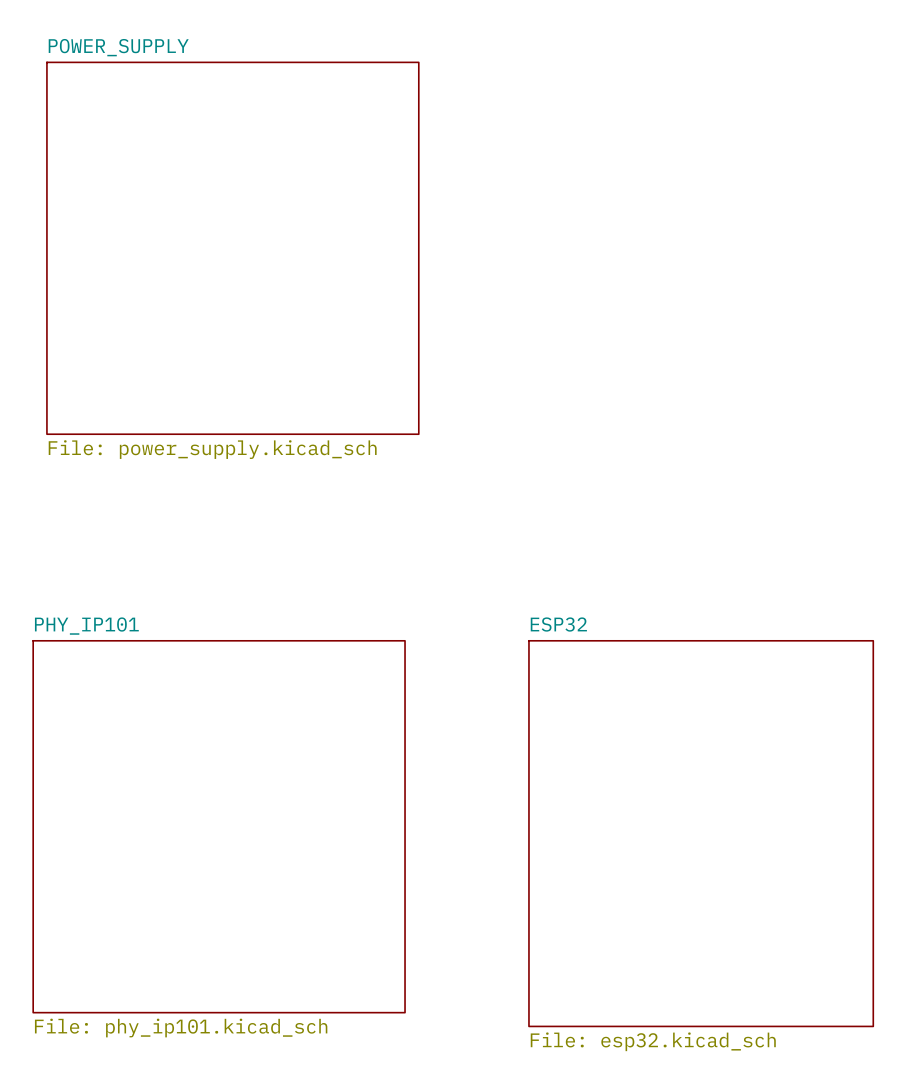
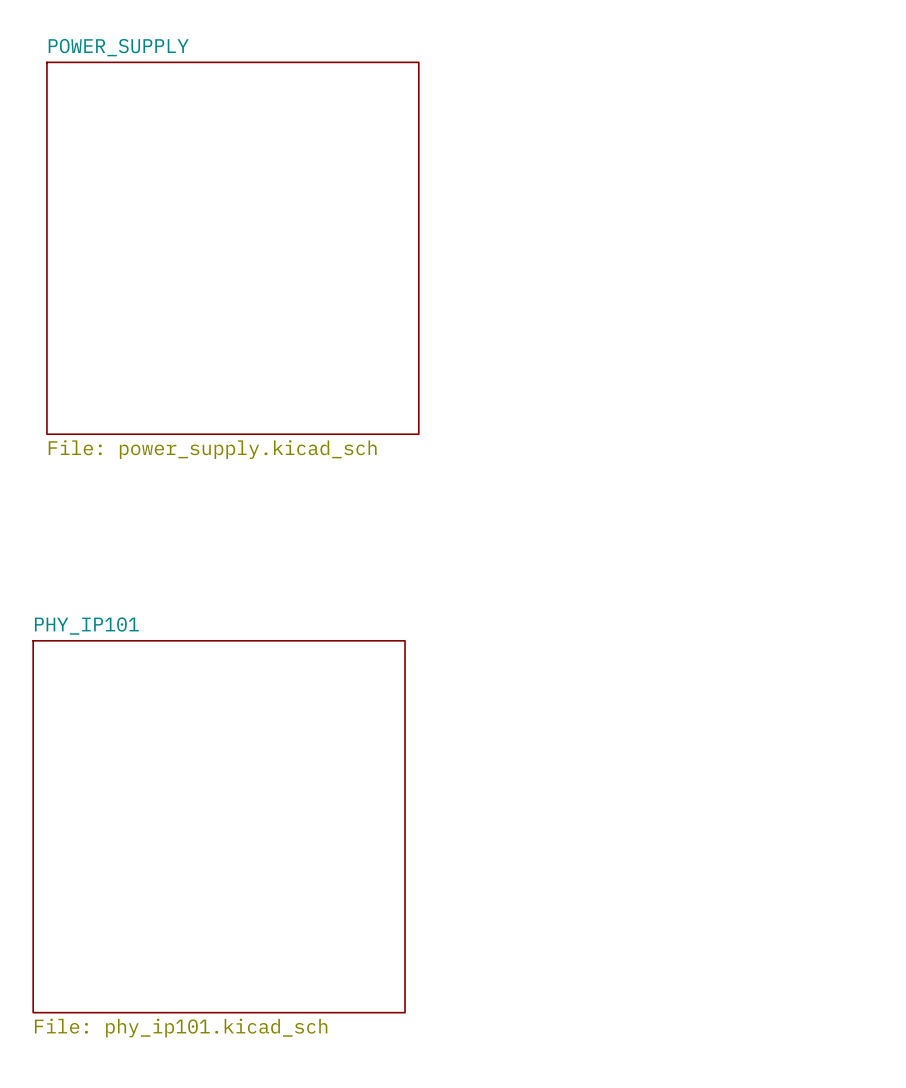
sheet ESP32: File: esp32.kicad_sch (701, 833) -> none

